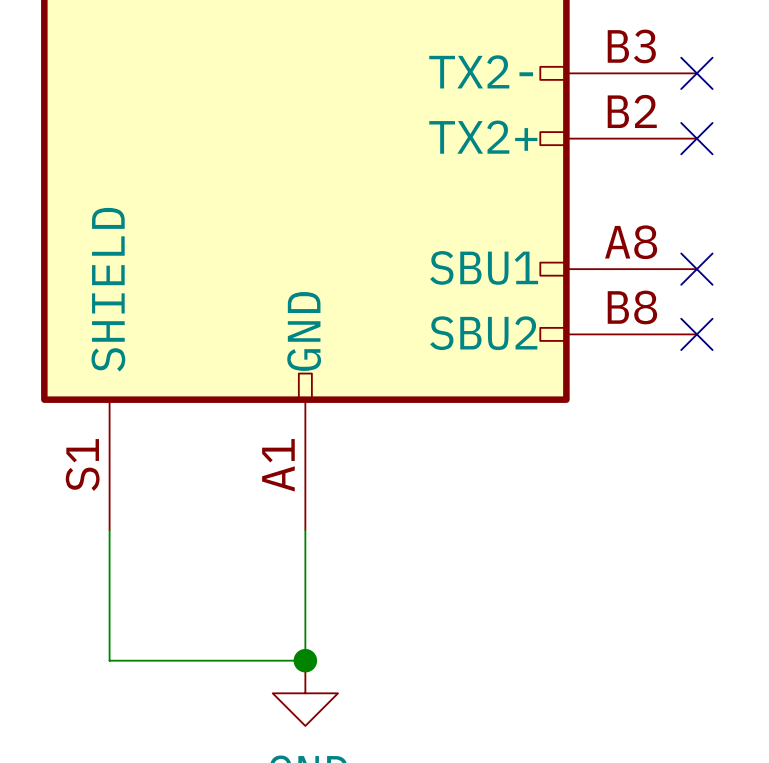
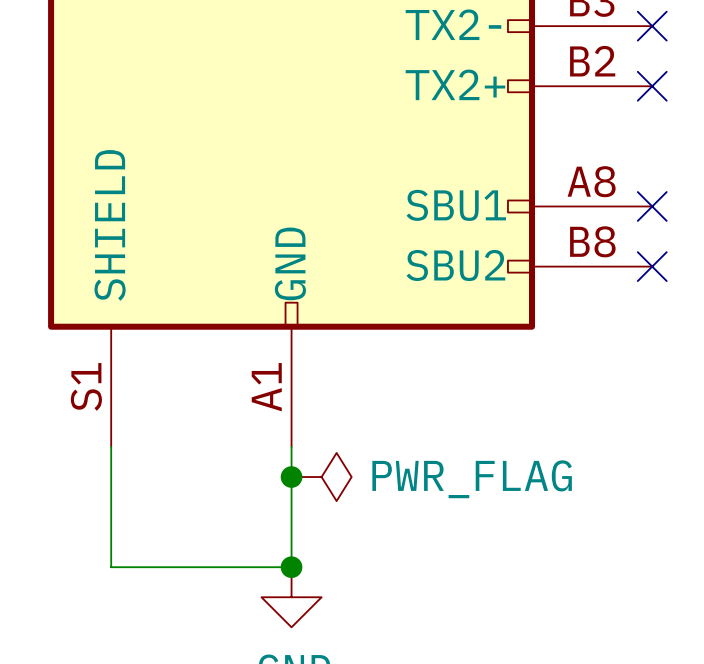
junction: none -> (291, 477)
power symbol: none -> PWR_FLAG (321, 477)

